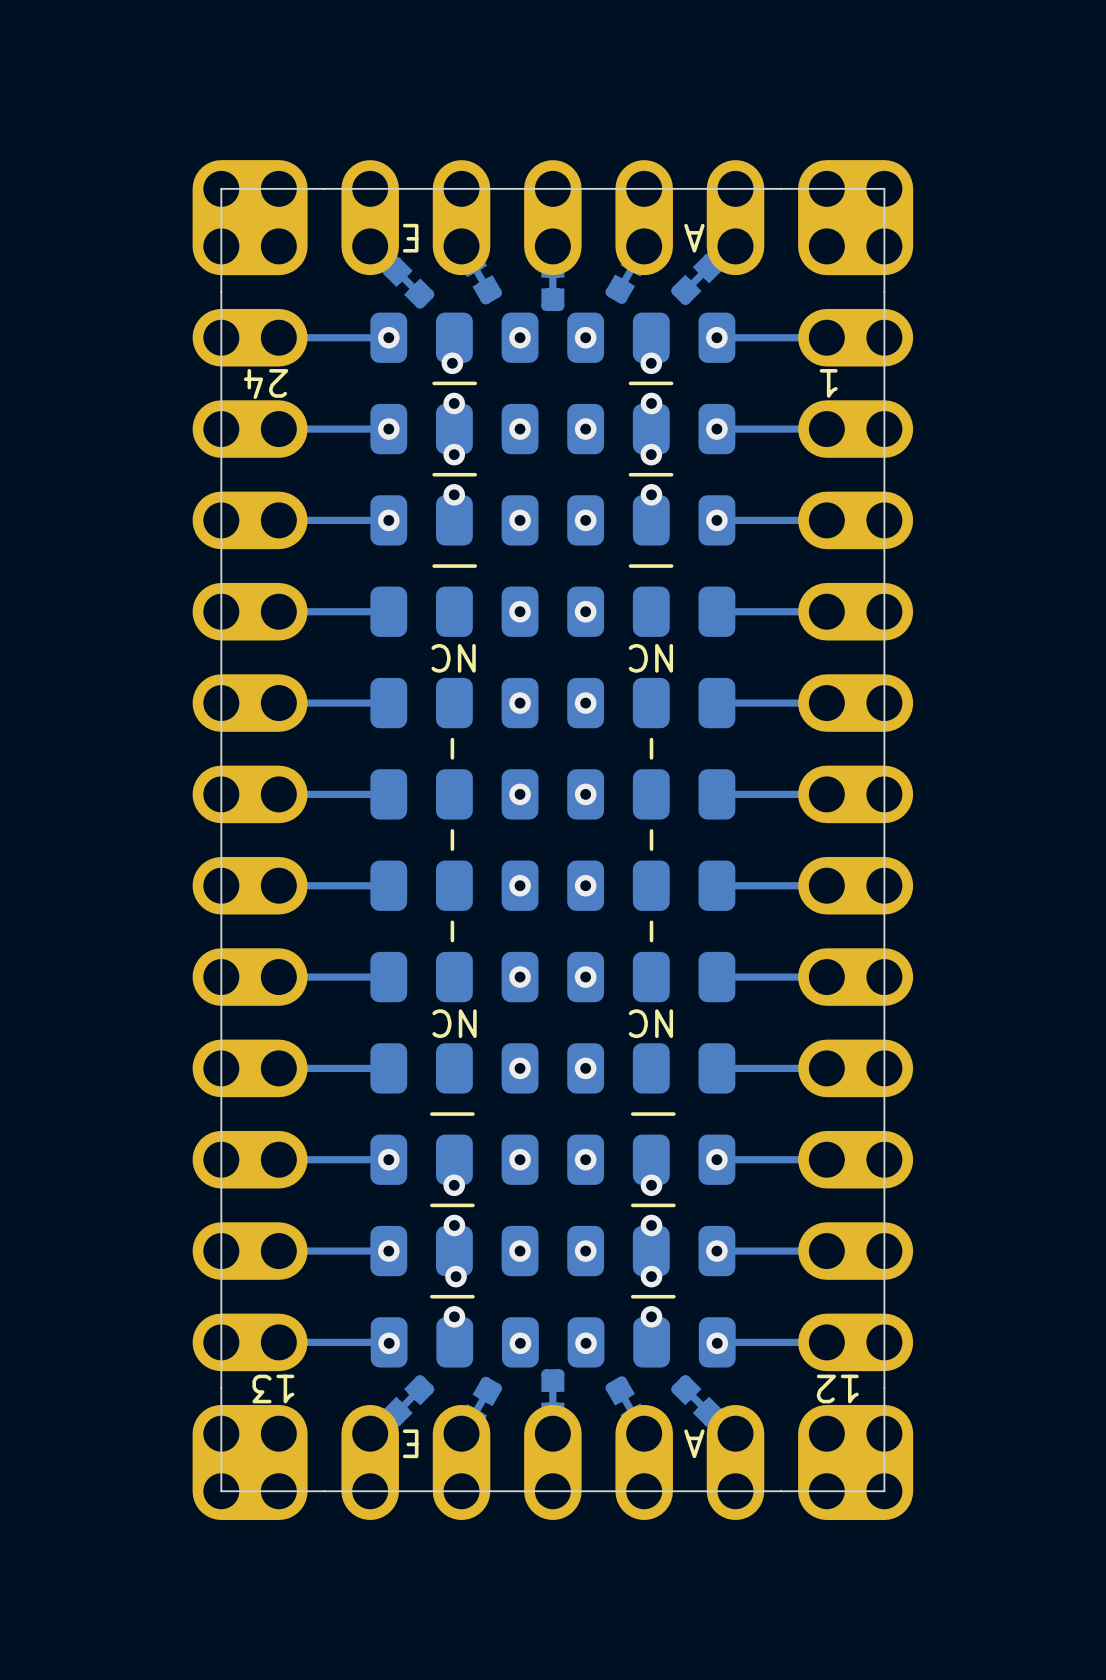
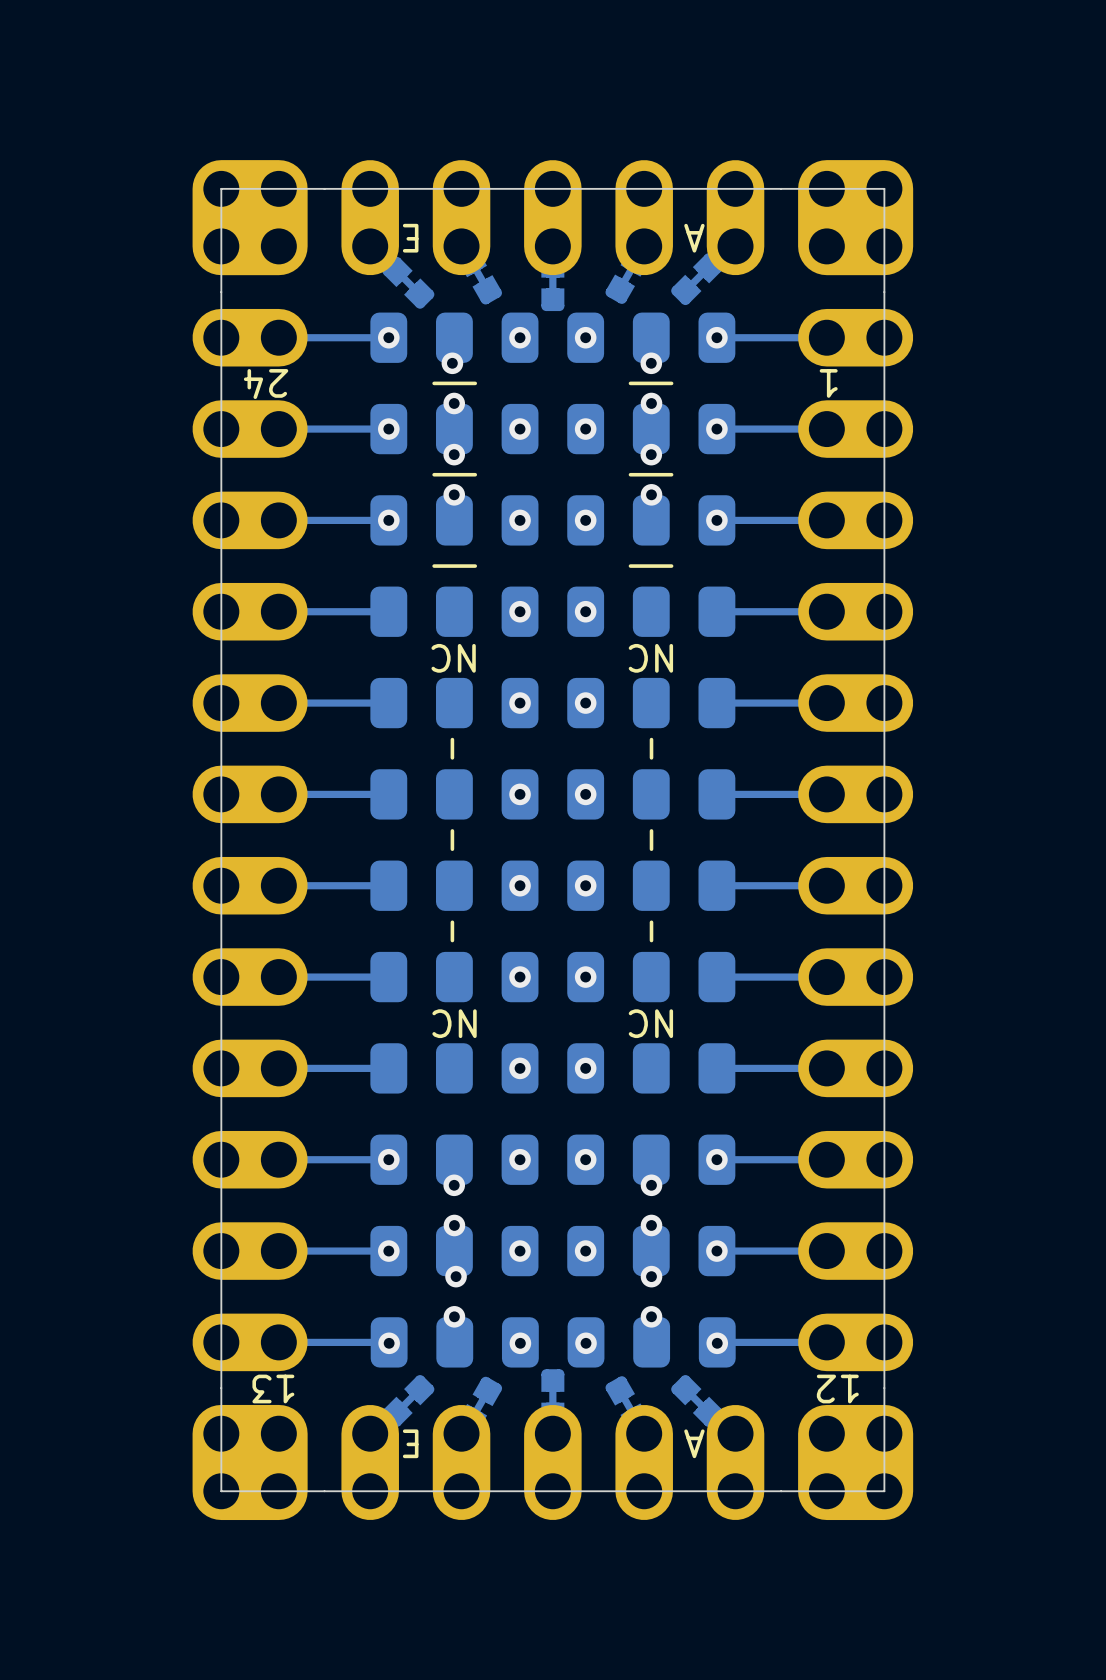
line: (472, 1114) (431, 1114) -> none
line: (673, 1114) (632, 1114) -> none
line: (472, 1205) (431, 1205) -> none
line: (673, 1205) (632, 1205) -> none
line: (472, 1296) (431, 1296) -> none
line: (673, 1296) (632, 1296) -> none

